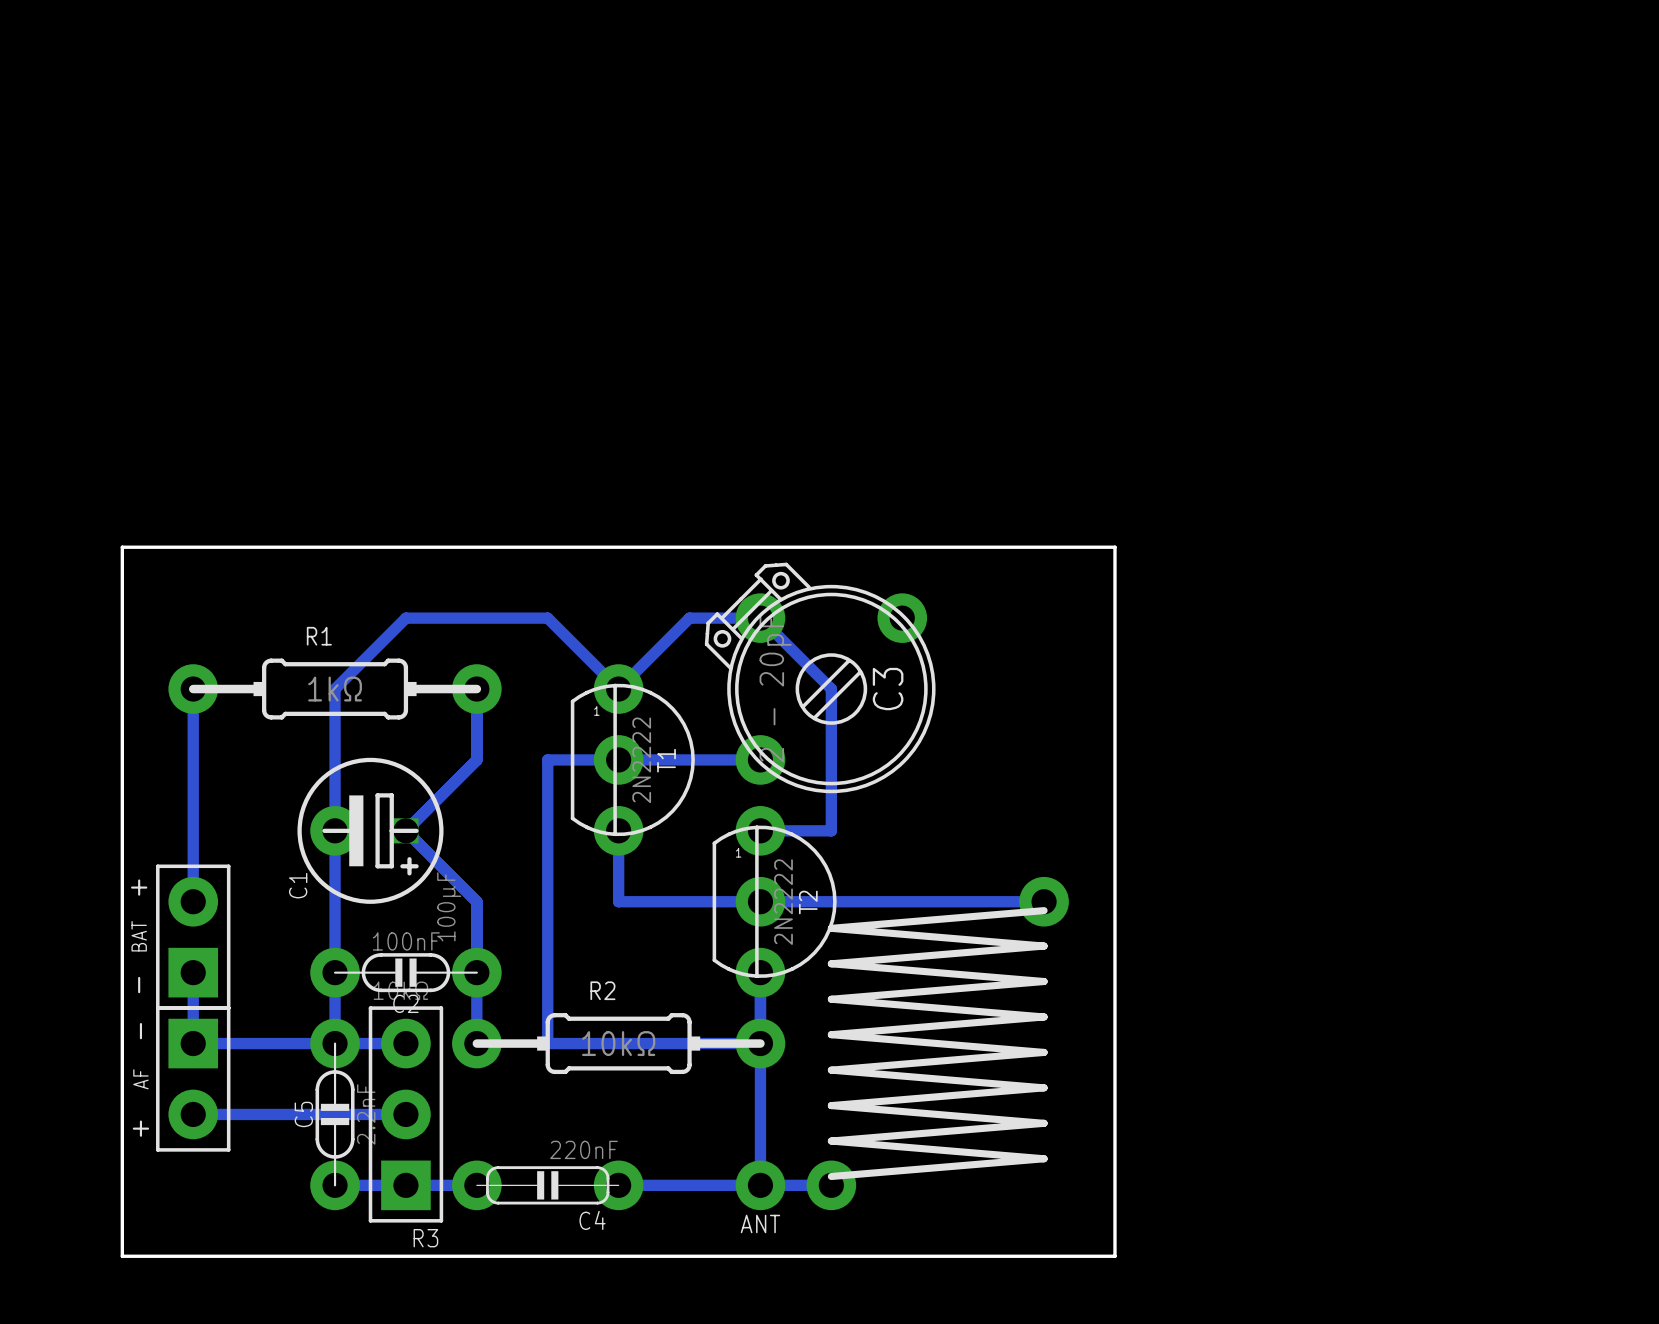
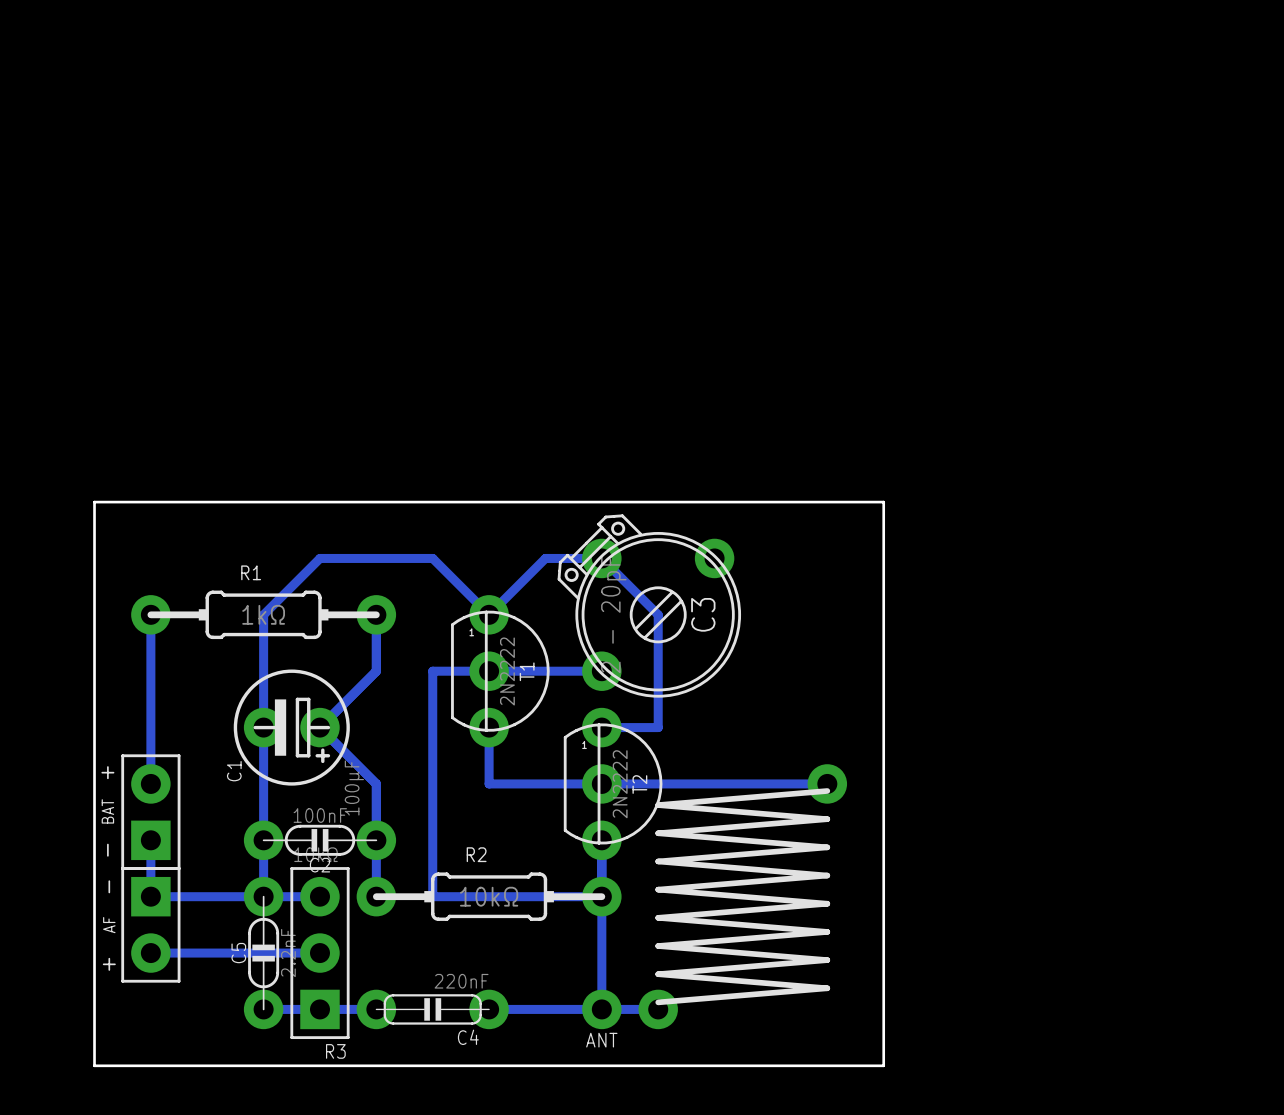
C1 footprint: [297, 757, 444, 904] -> [233, 669, 350, 786]

